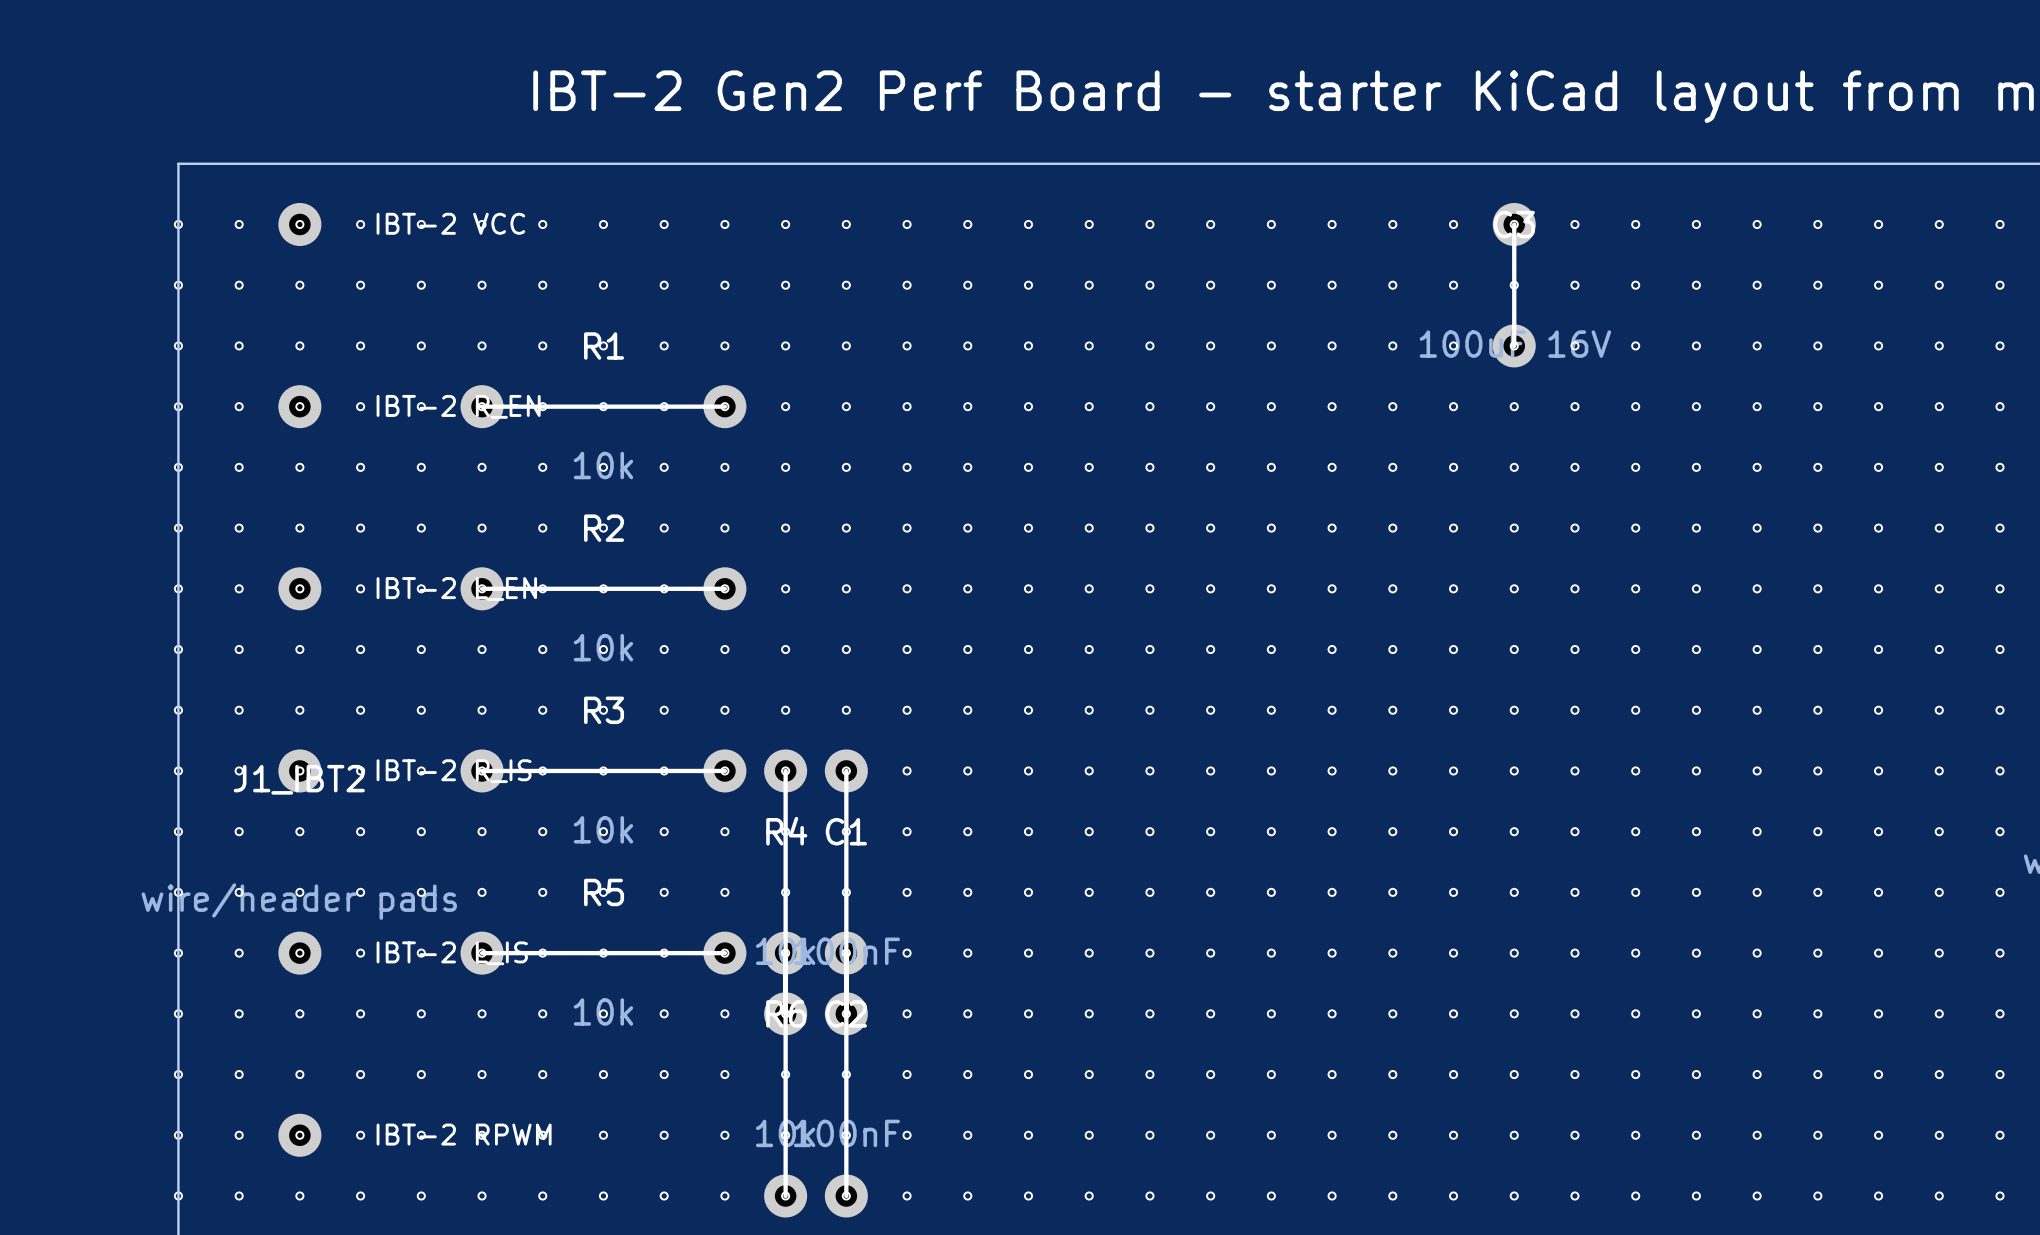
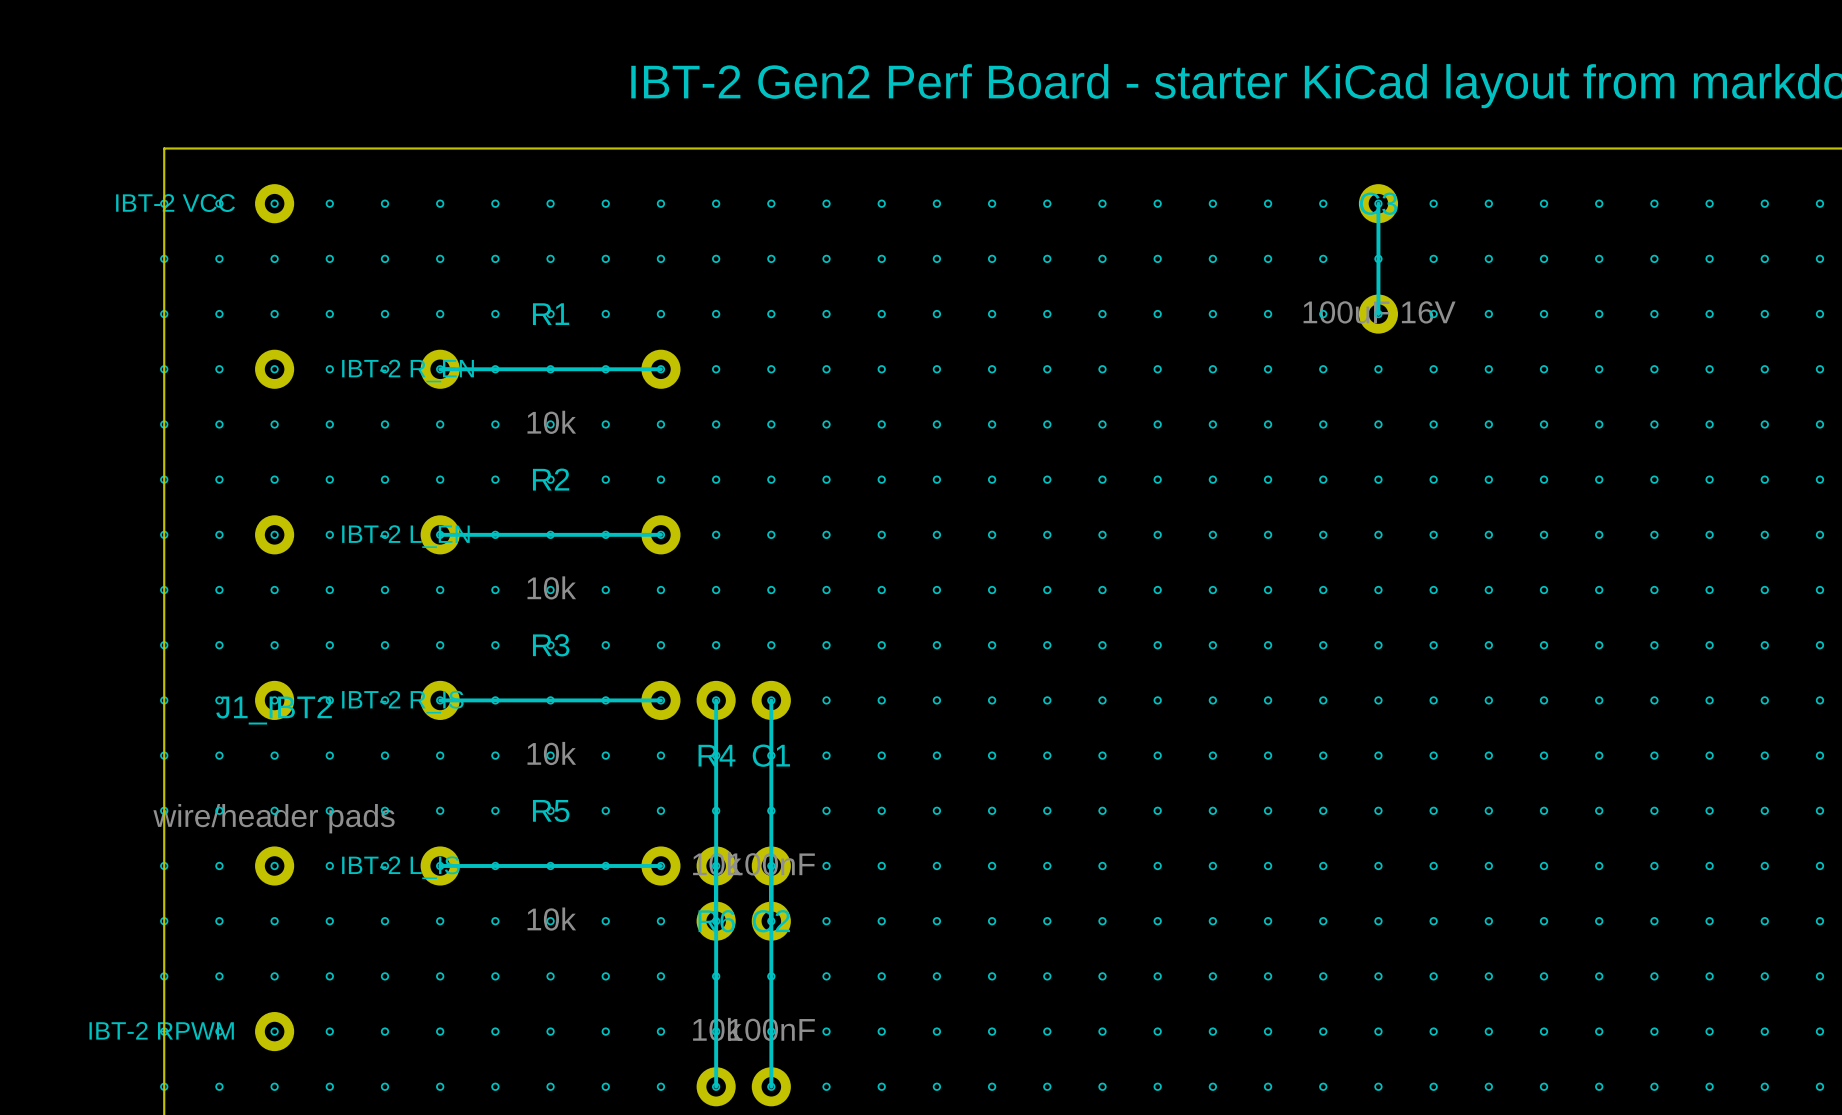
text position: IBT-2 VCC (450, 223) -> IBT-2 VCC (175, 203)
text position: IBT-2 RPWM (464, 1134) -> IBT-2 RPWM (161, 1030)

